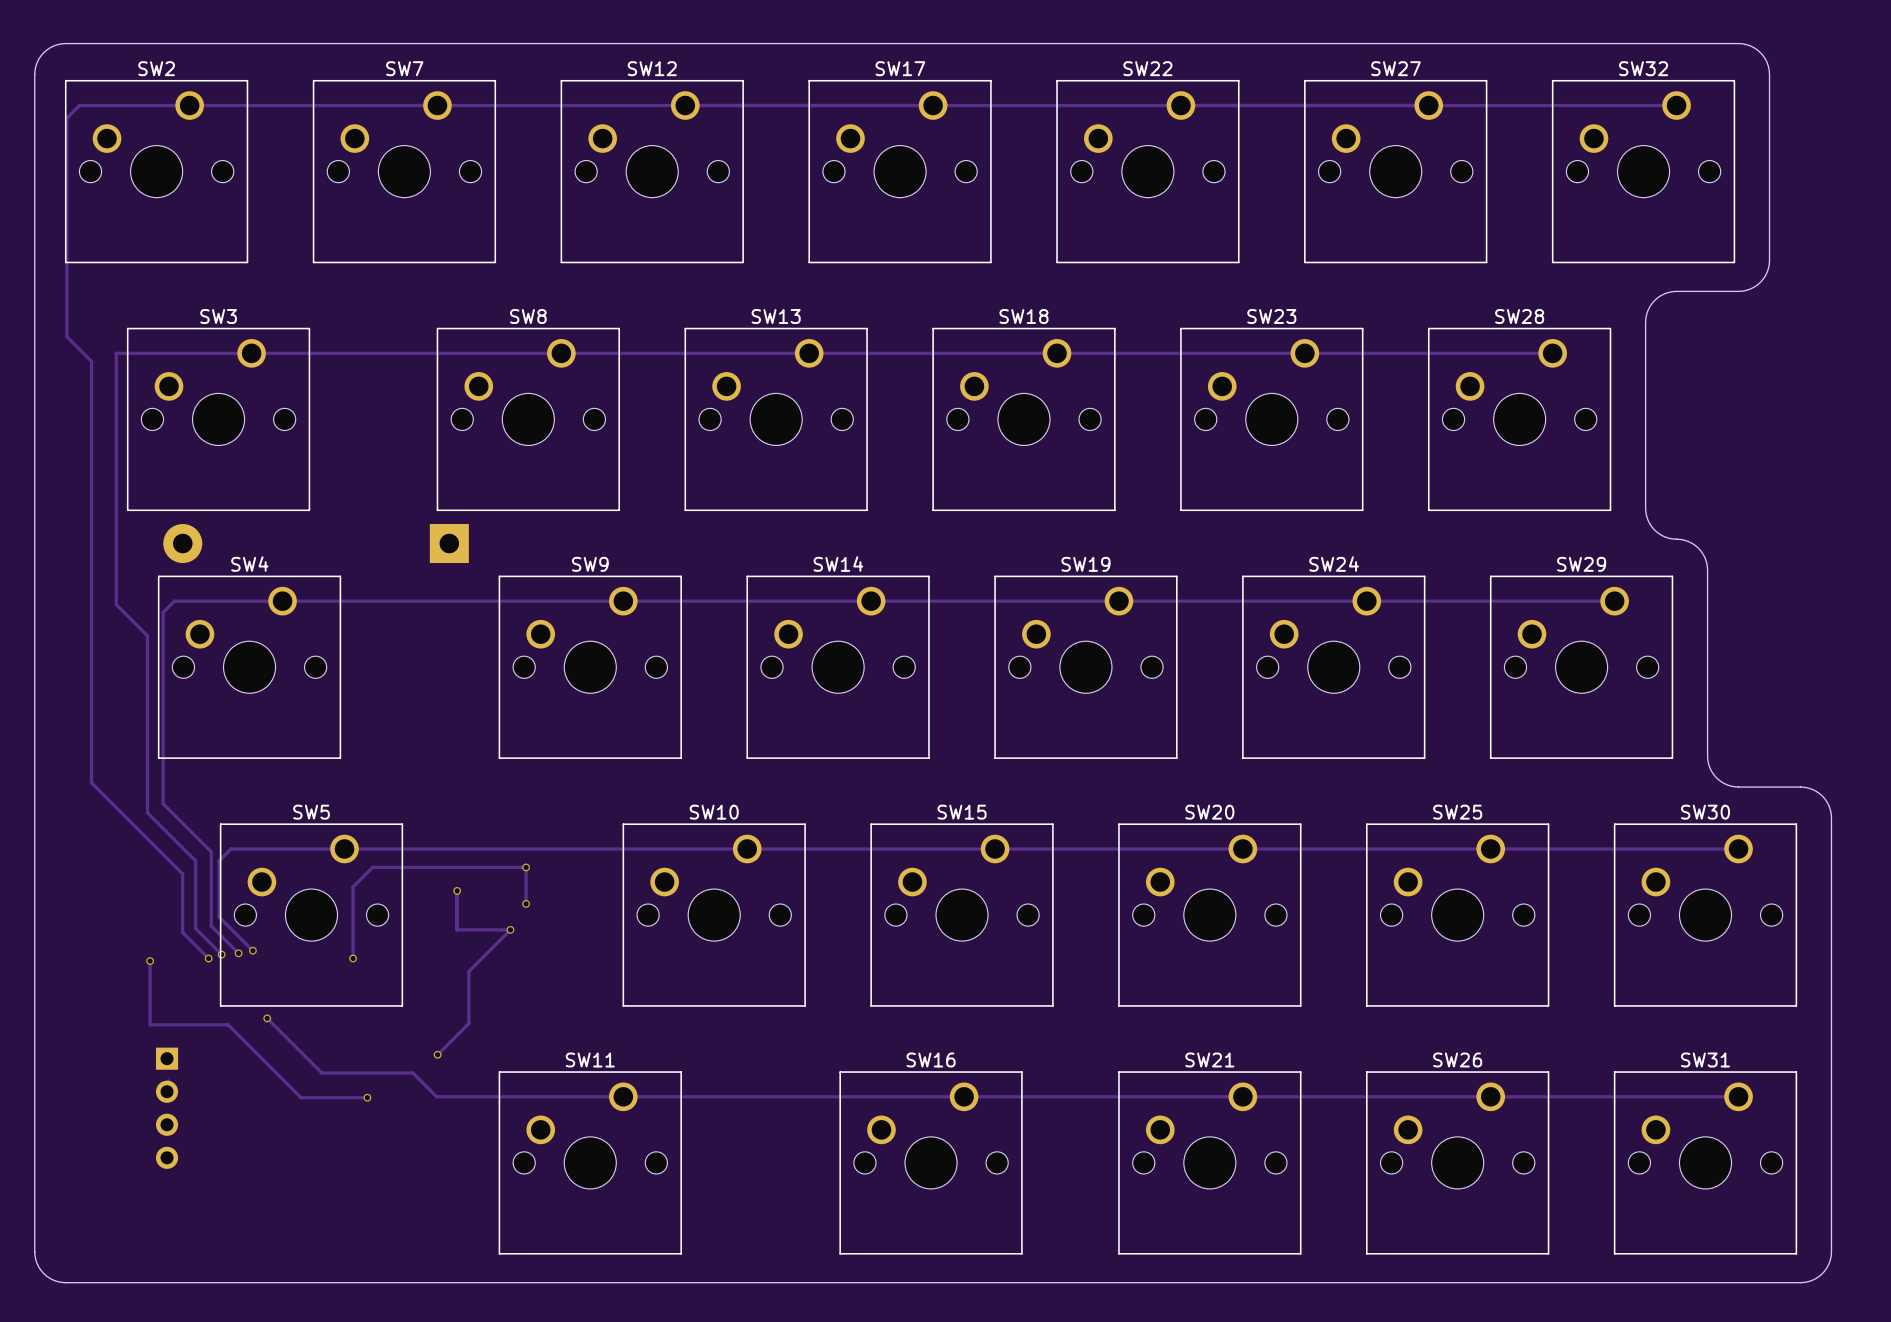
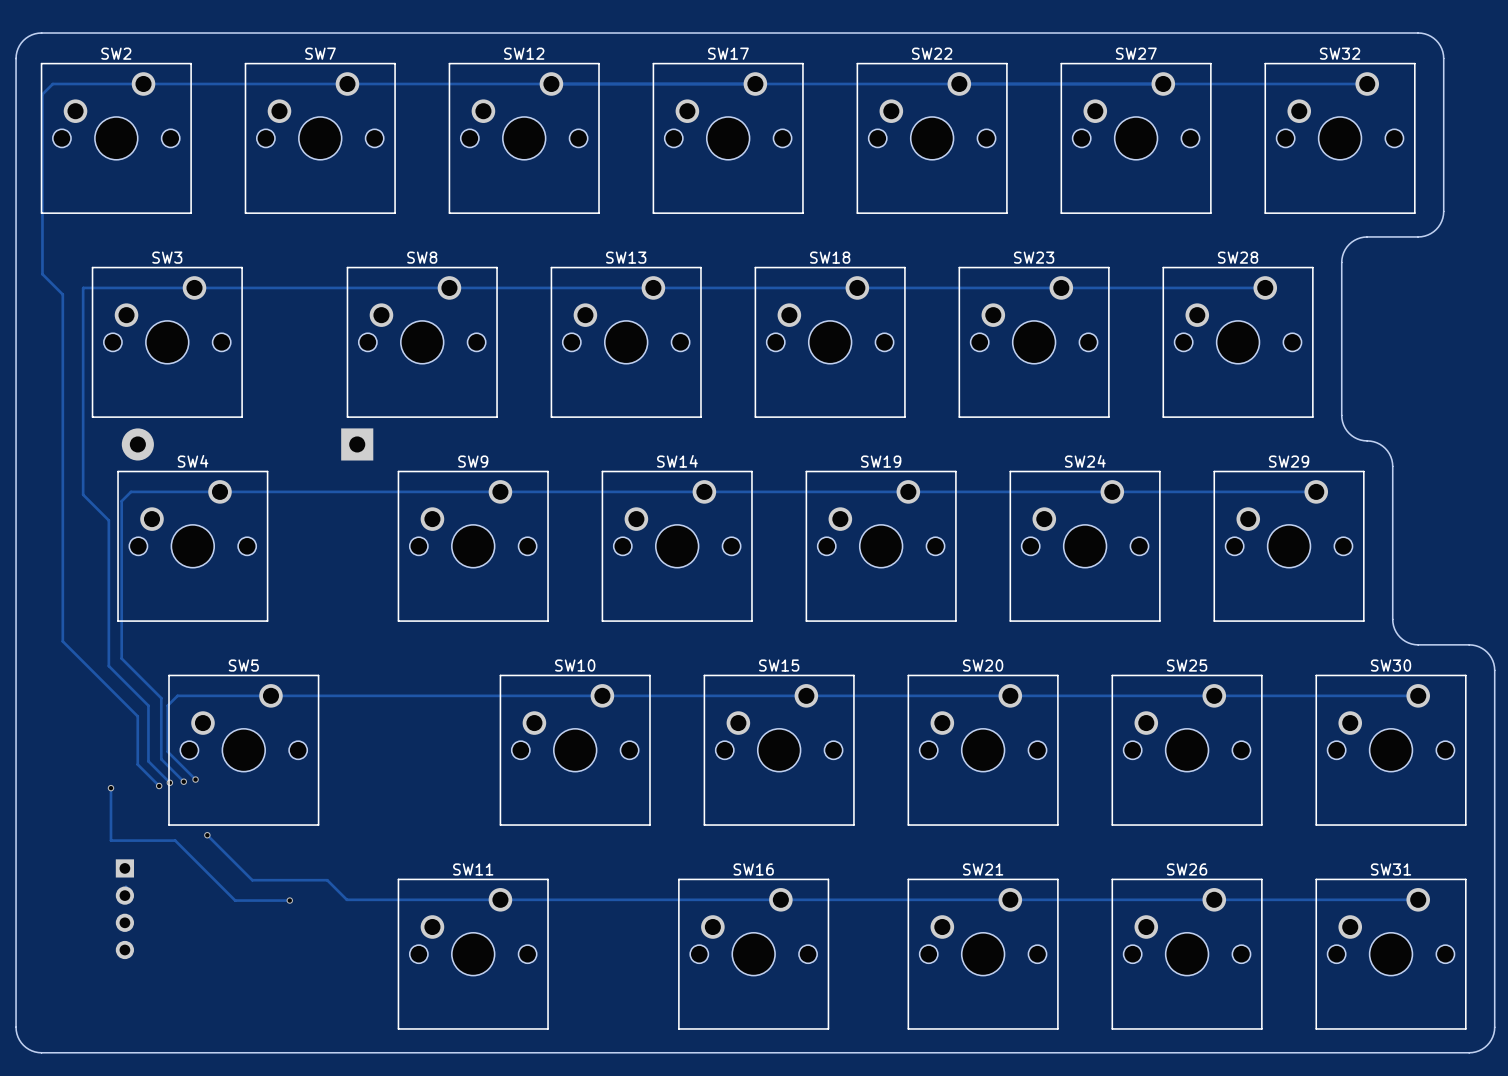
via: (526, 867) -> none
track: (457, 890) (457, 929) (510, 929) (468, 971) (468, 1023) (437, 1054) -> none
via: (457, 890) -> none
track: (526, 903) (526, 867) (372, 867) (353, 886) (353, 958) -> none
via: (526, 903) -> none
via: (510, 929) -> none
via: (353, 958) -> none
via: (437, 1054) -> none

